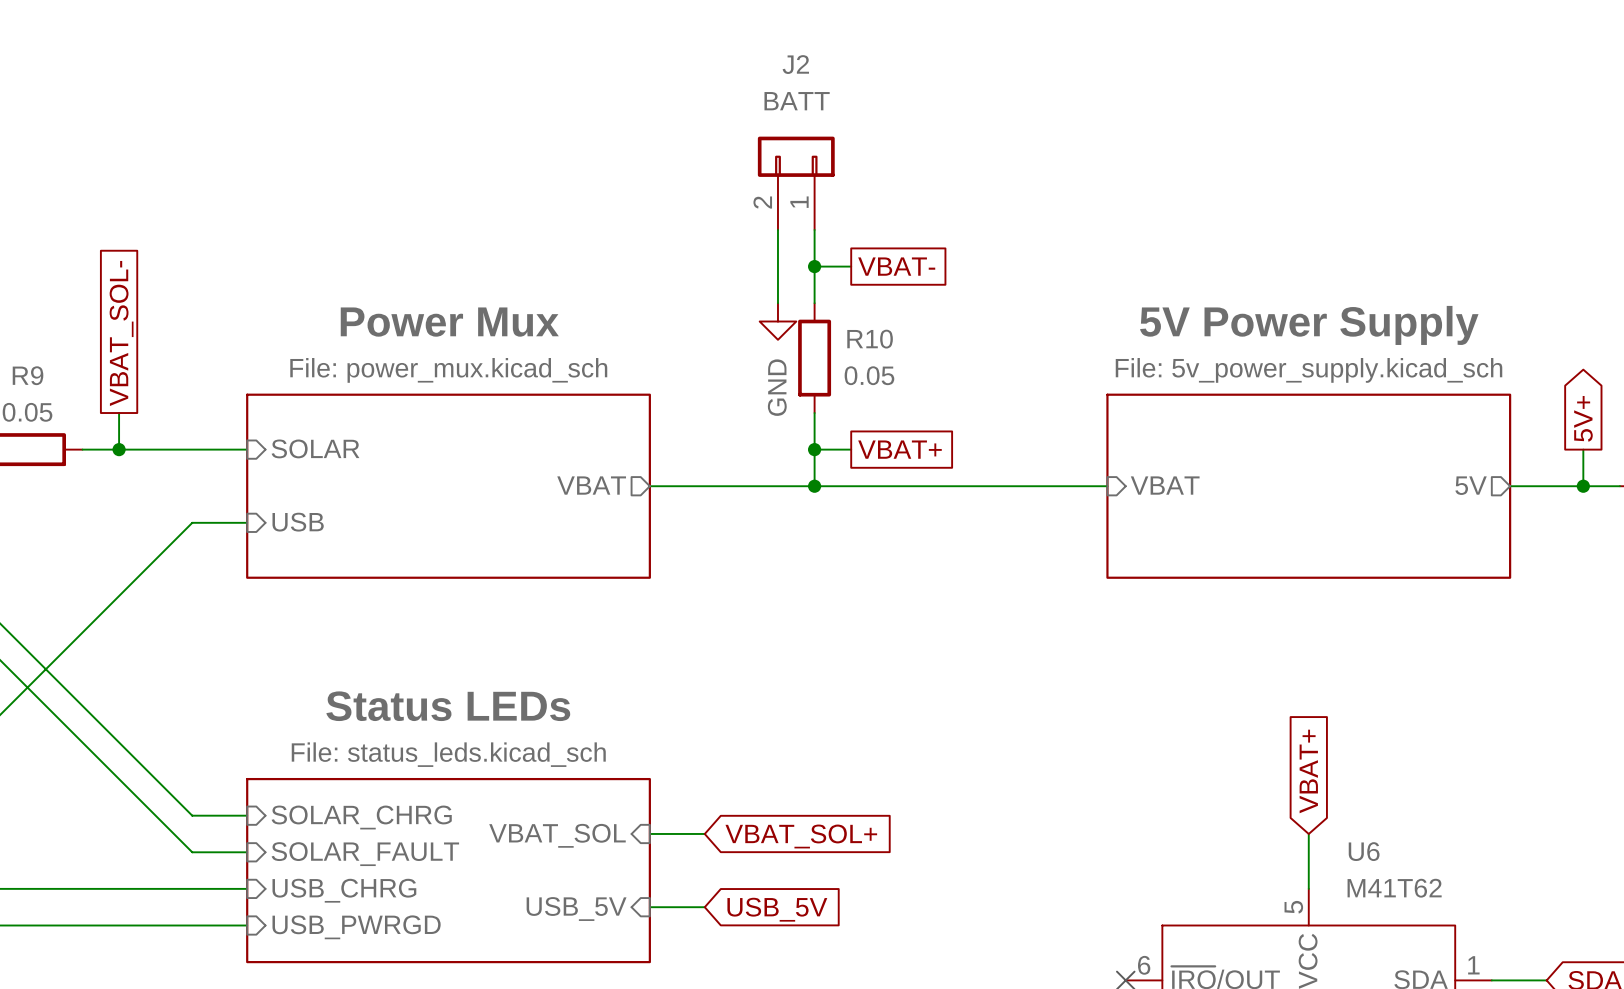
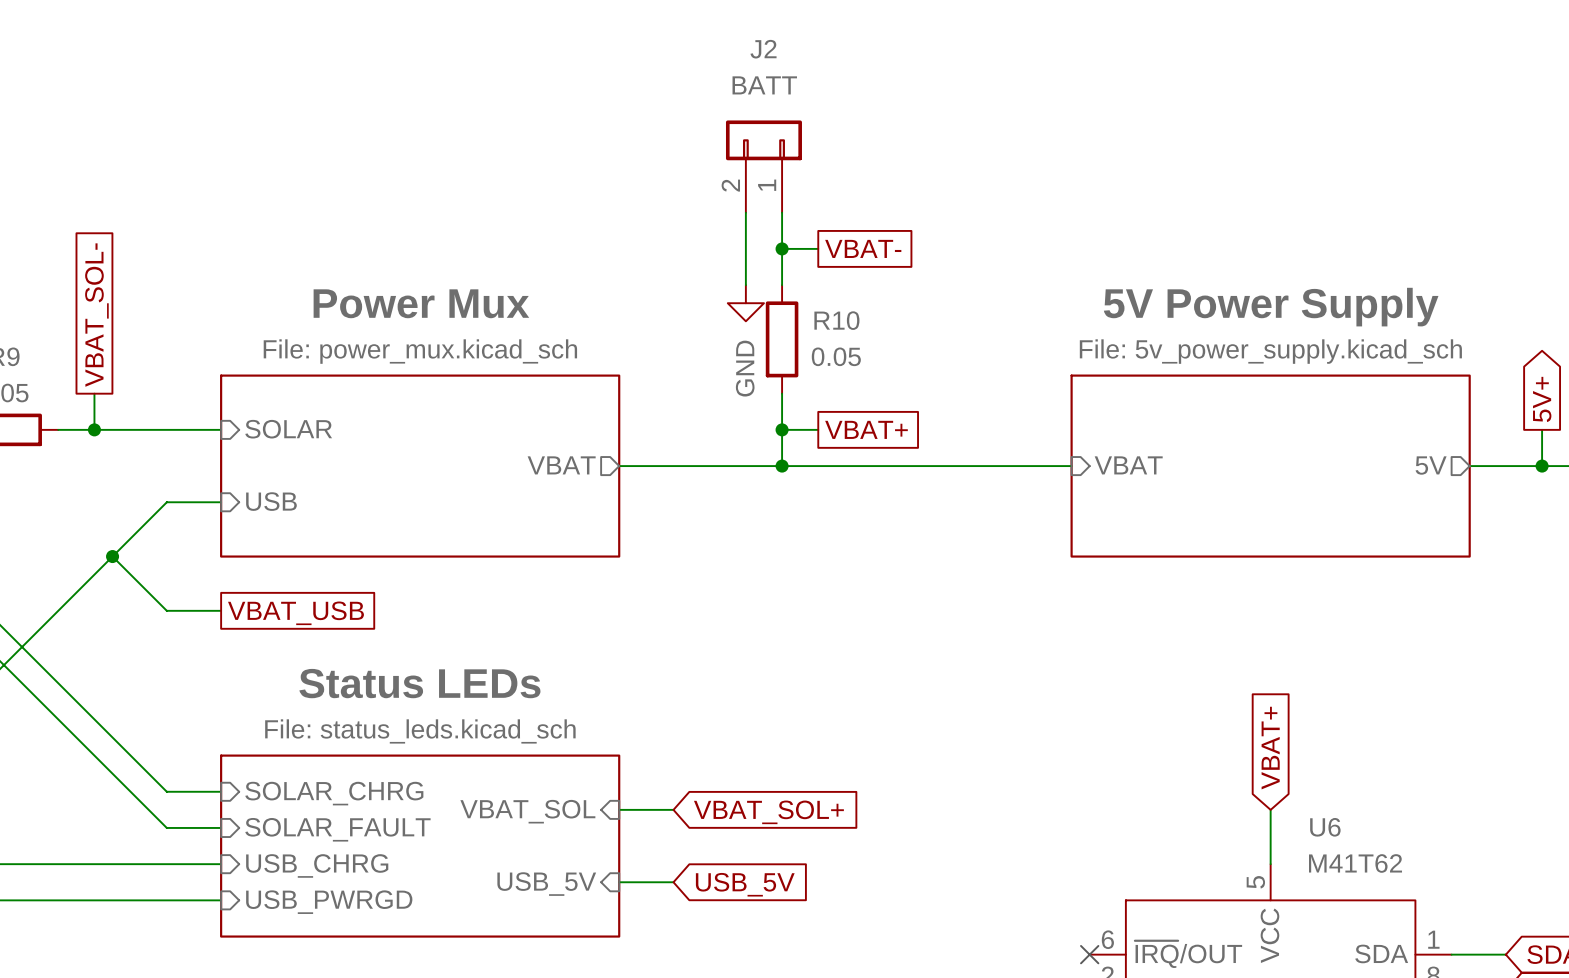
wire: none -> (112, 556) (166, 610) (221, 610)
junction: none -> (112, 556)
global label: none -> VBAT_USB (295, 613)

